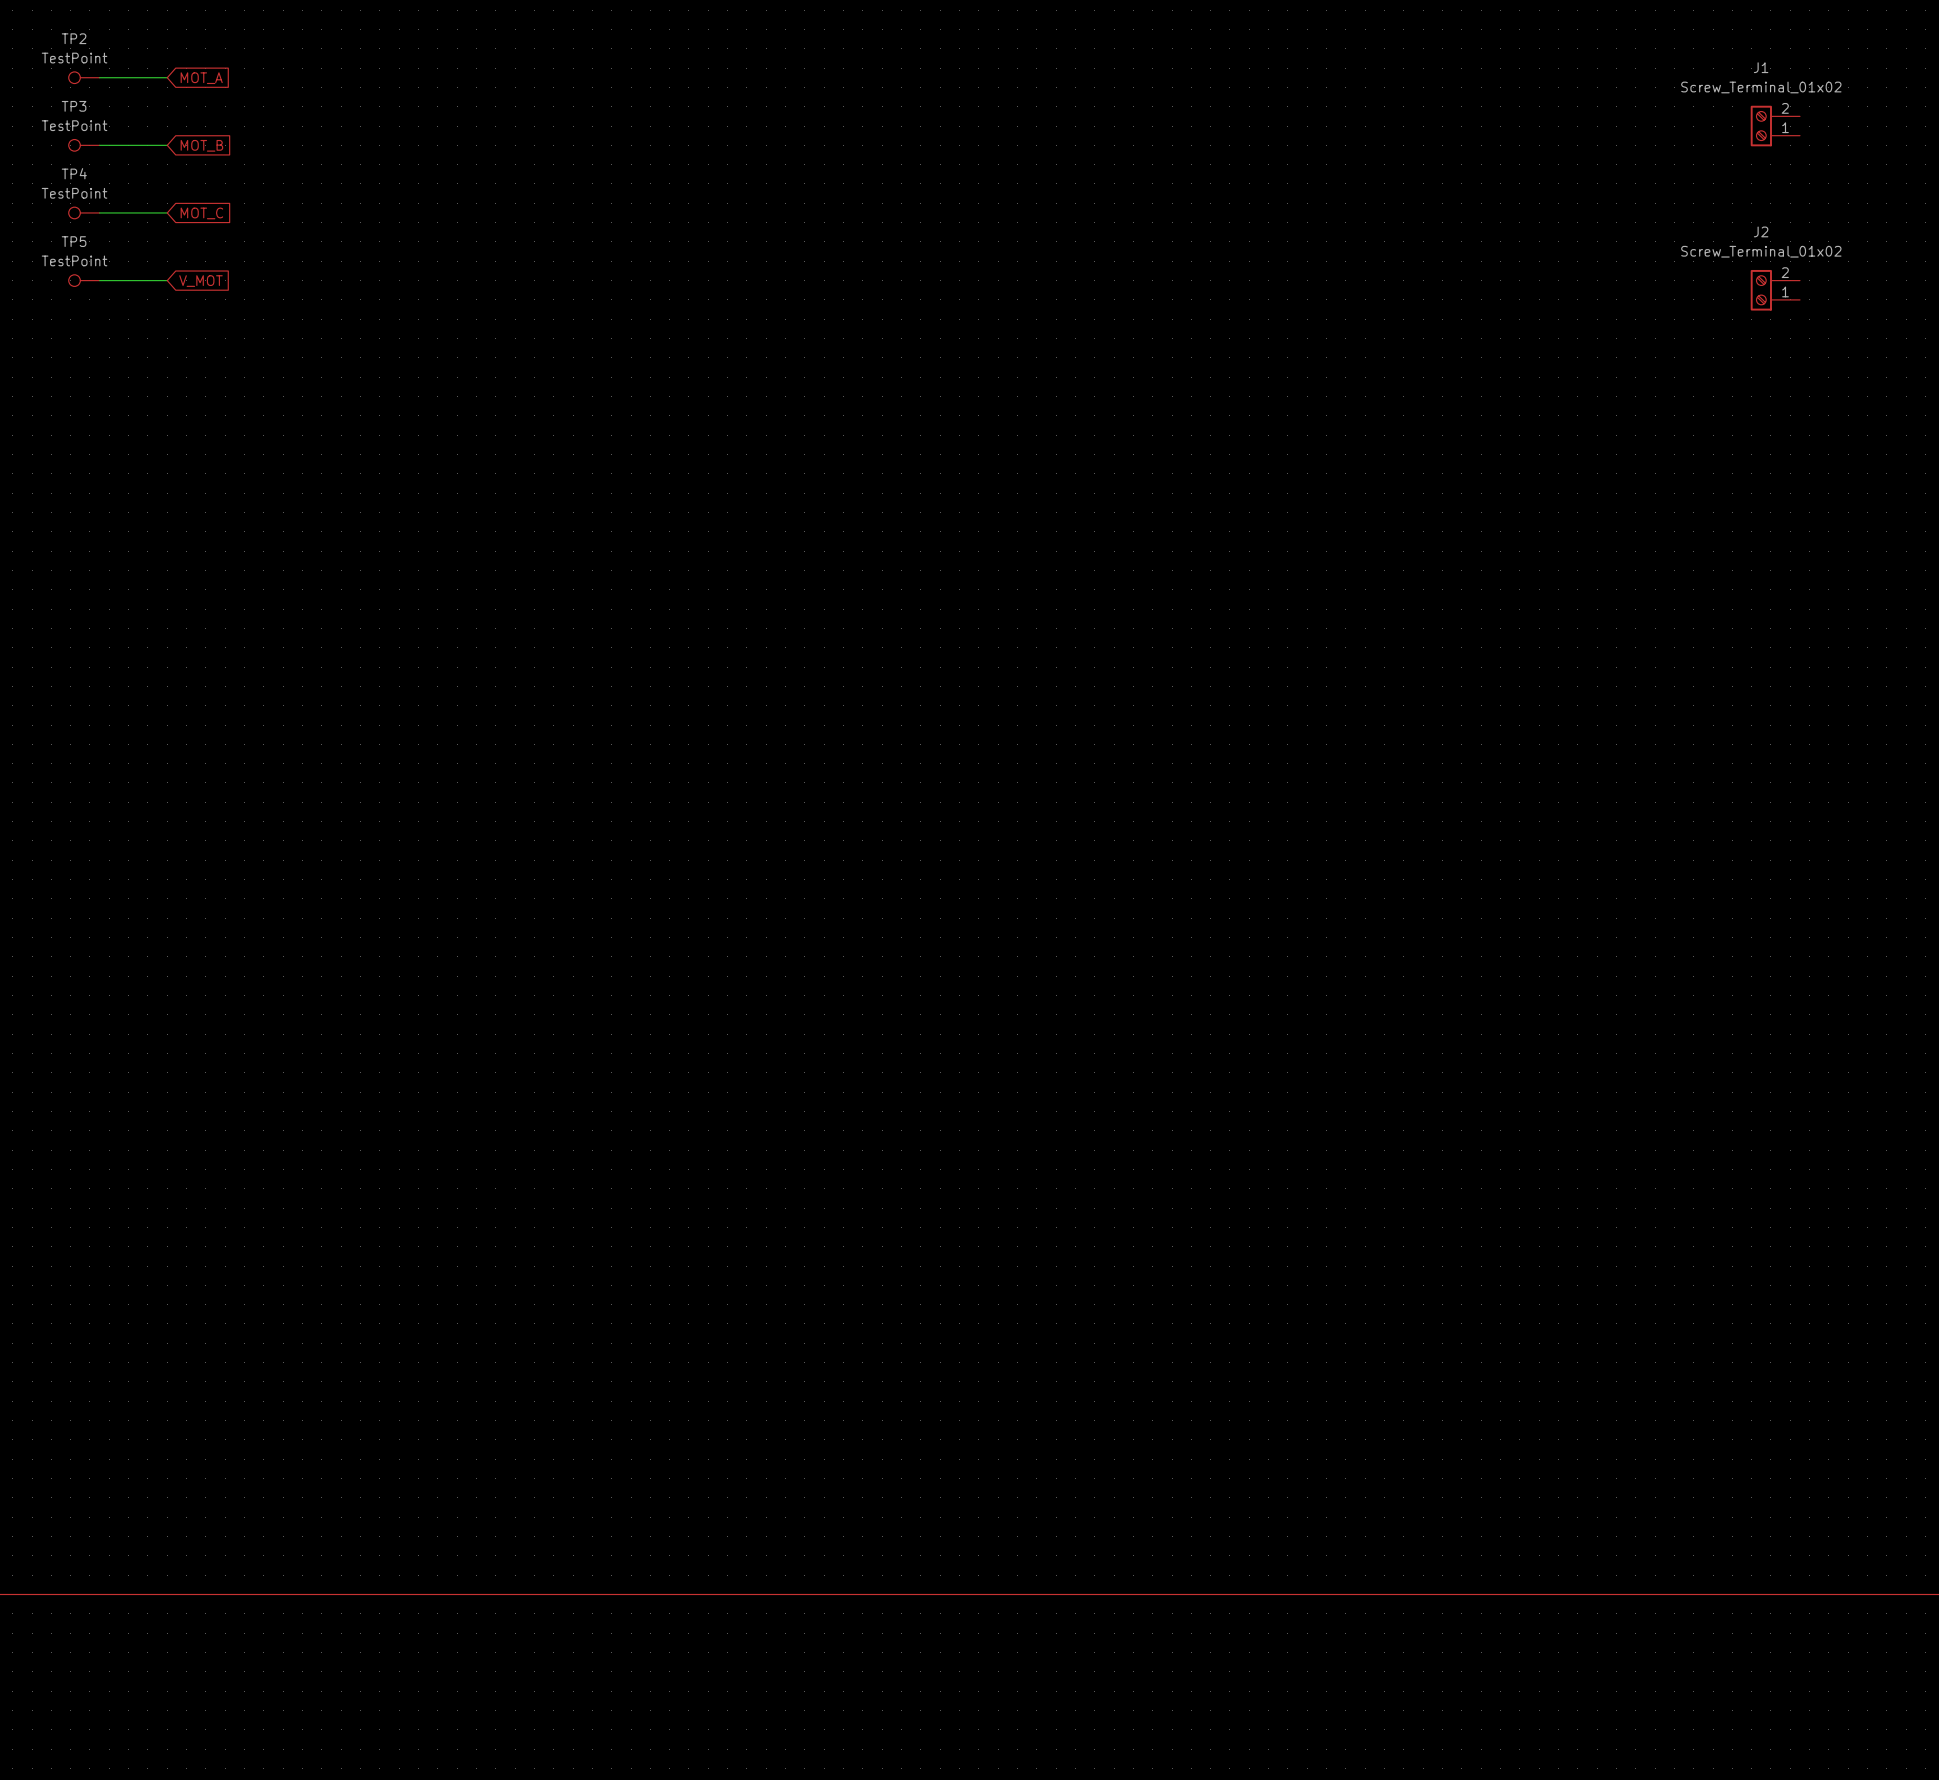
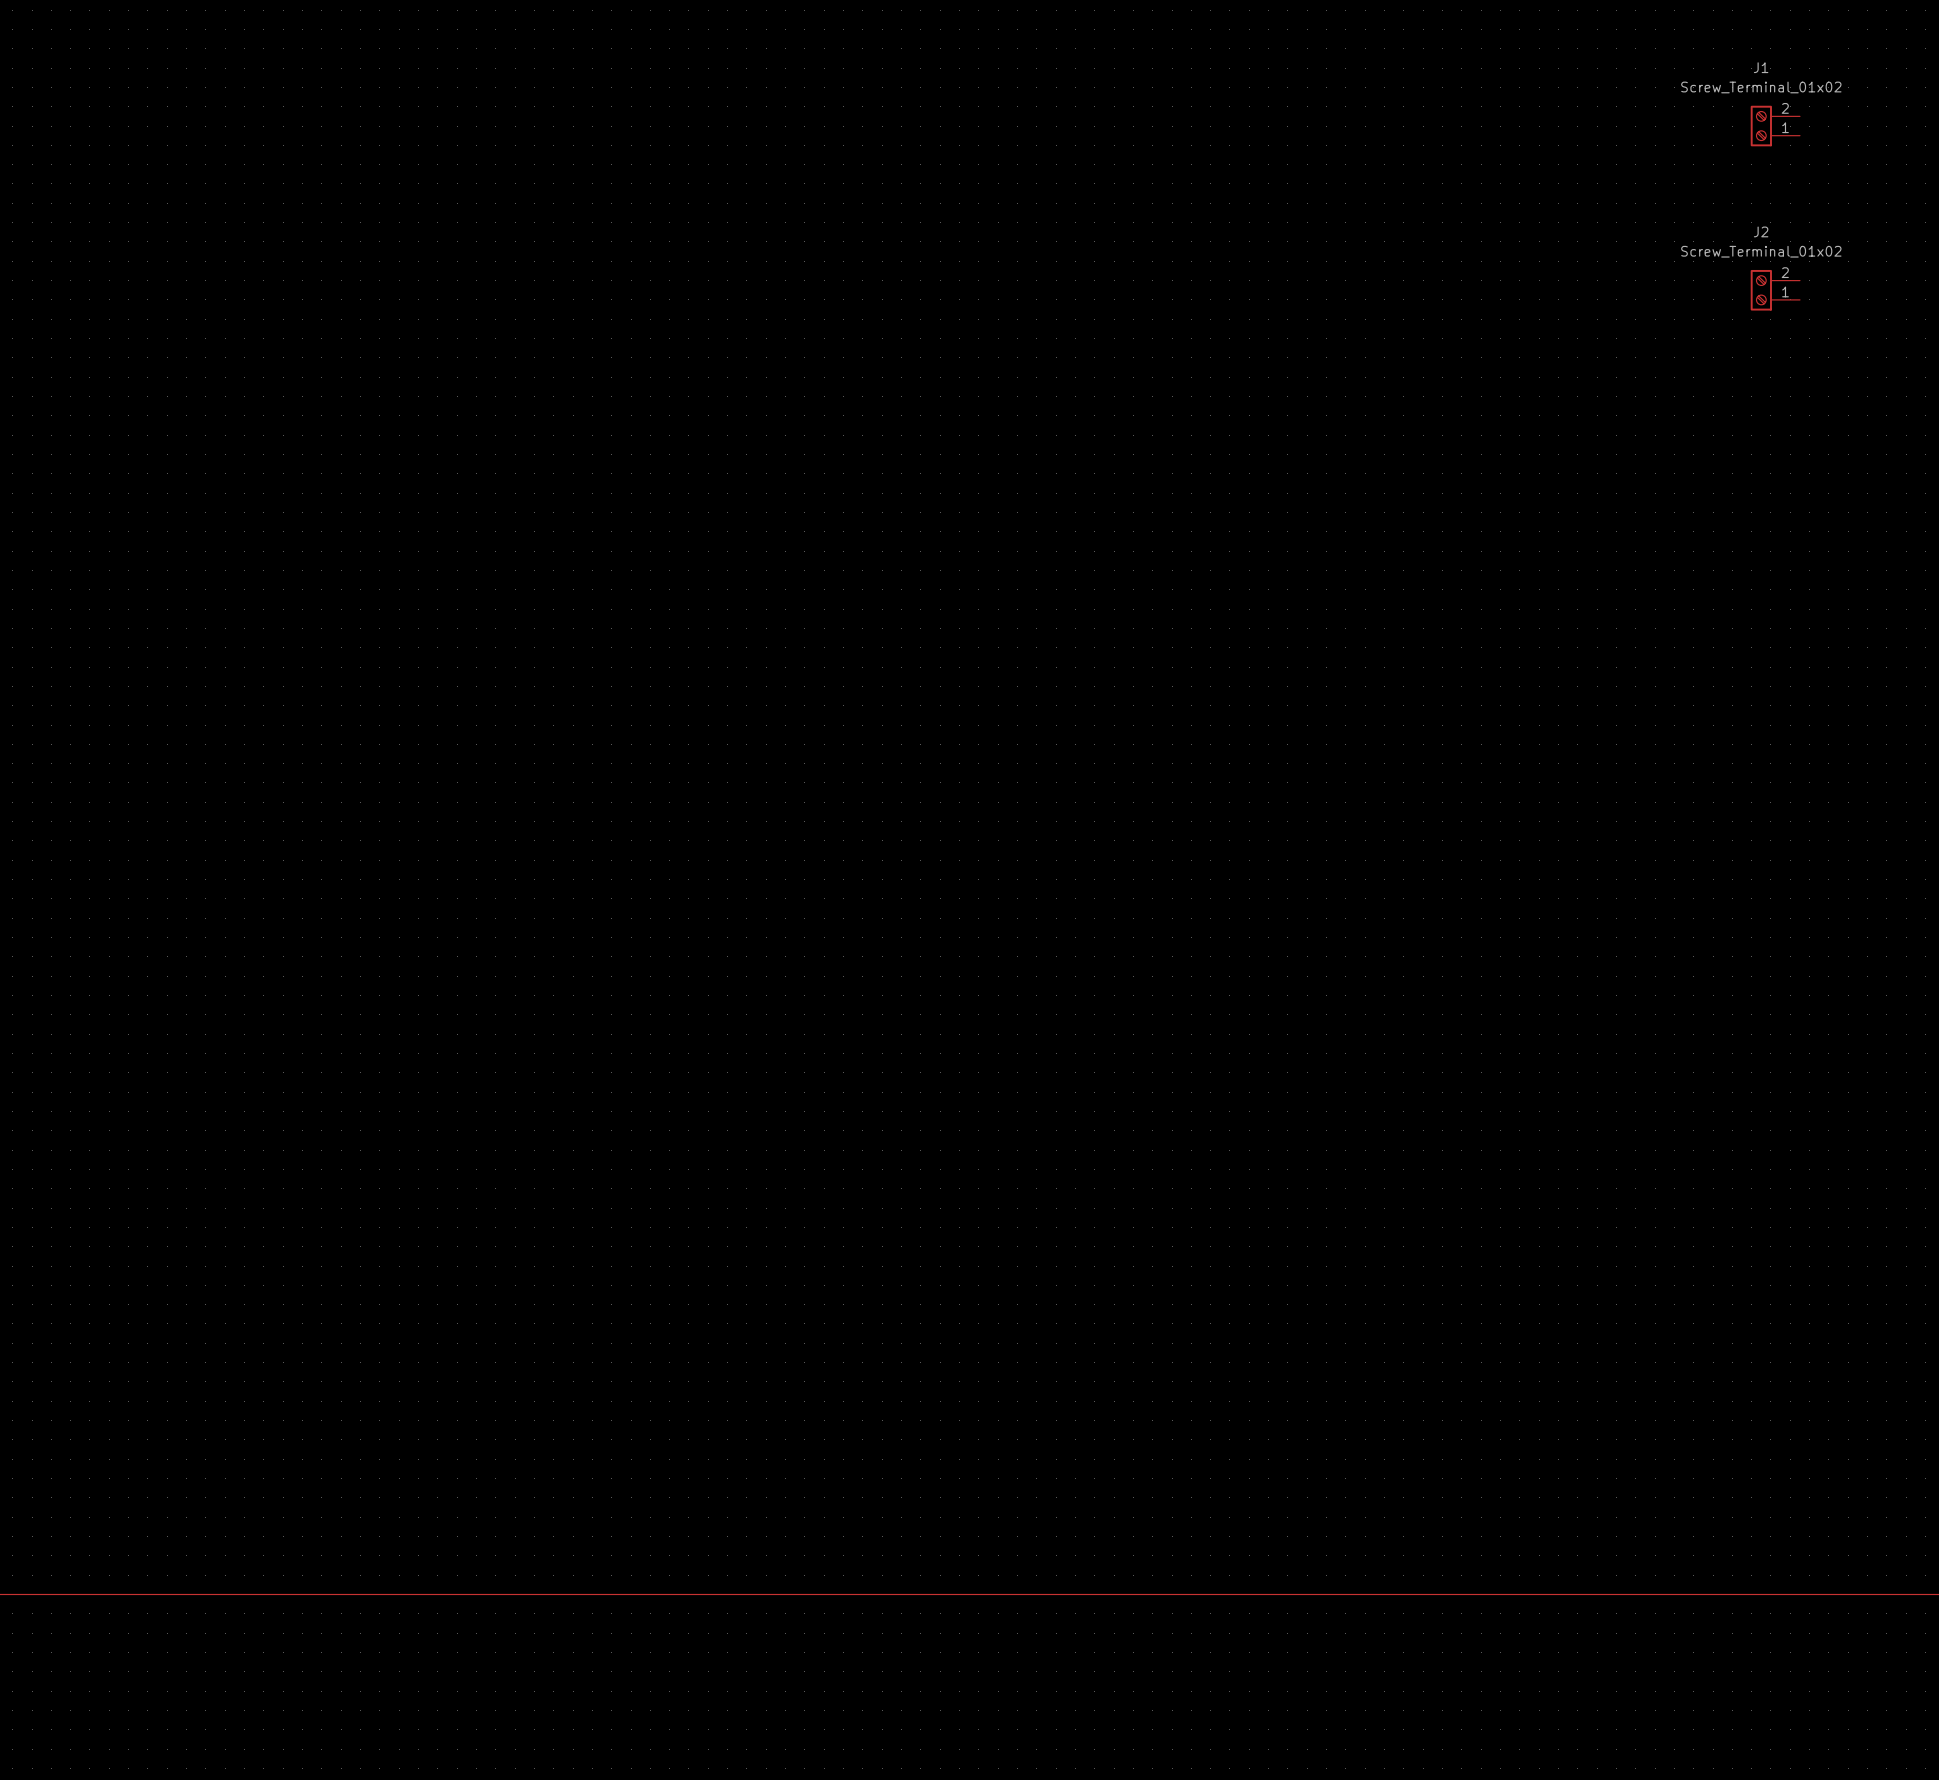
TP2: TestPoint (84, 77) -> none
wire: (99, 77) (167, 77) -> none
global label: MOT_A (201, 78) -> none
TP3: TestPoint (84, 145) -> none
wire: (99, 145) (167, 145) -> none
global label: MOT_B (201, 145) -> none
TP4: TestPoint (84, 212) -> none
wire: (99, 212) (167, 212) -> none
global label: MOT_C (201, 213) -> none
TP5: TestPoint (84, 280) -> none
wire: (99, 280) (167, 280) -> none
global label: V_MOT (200, 281) -> none

